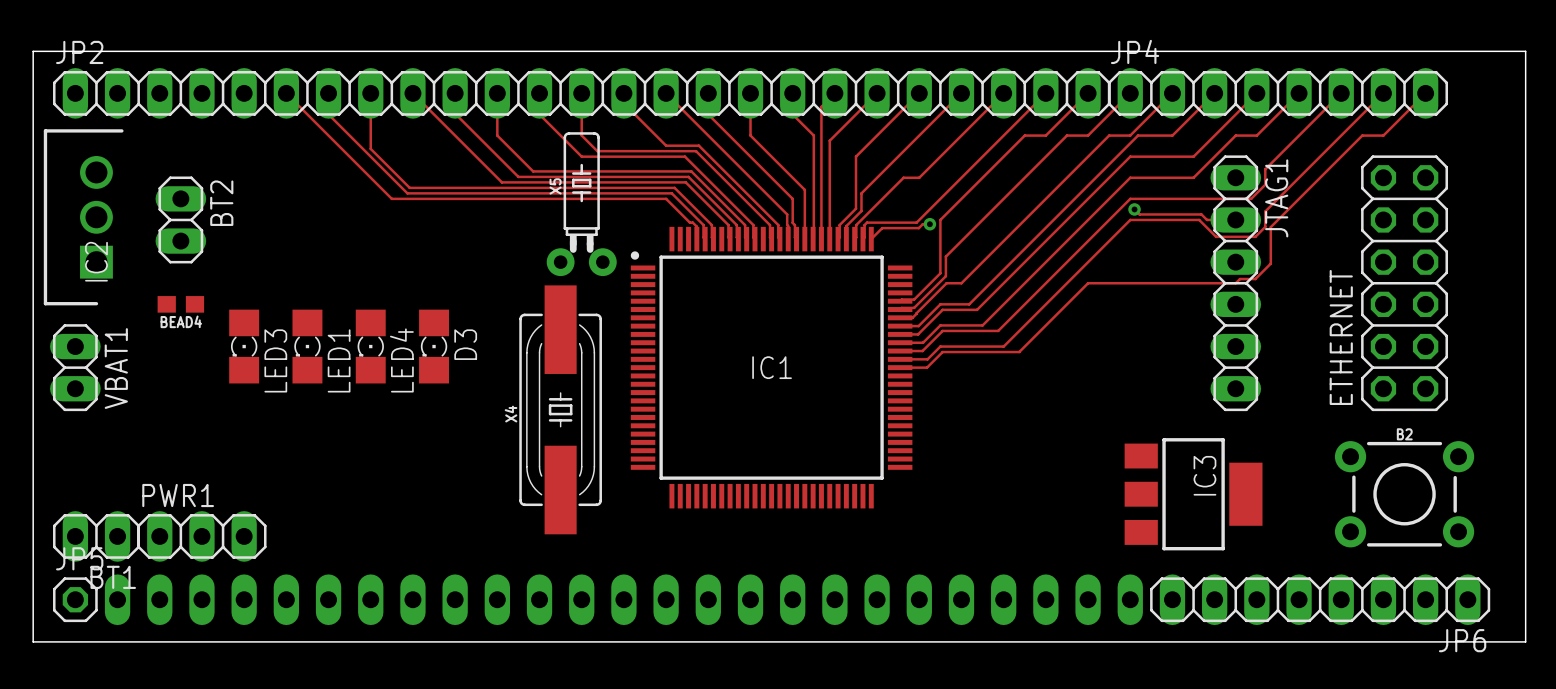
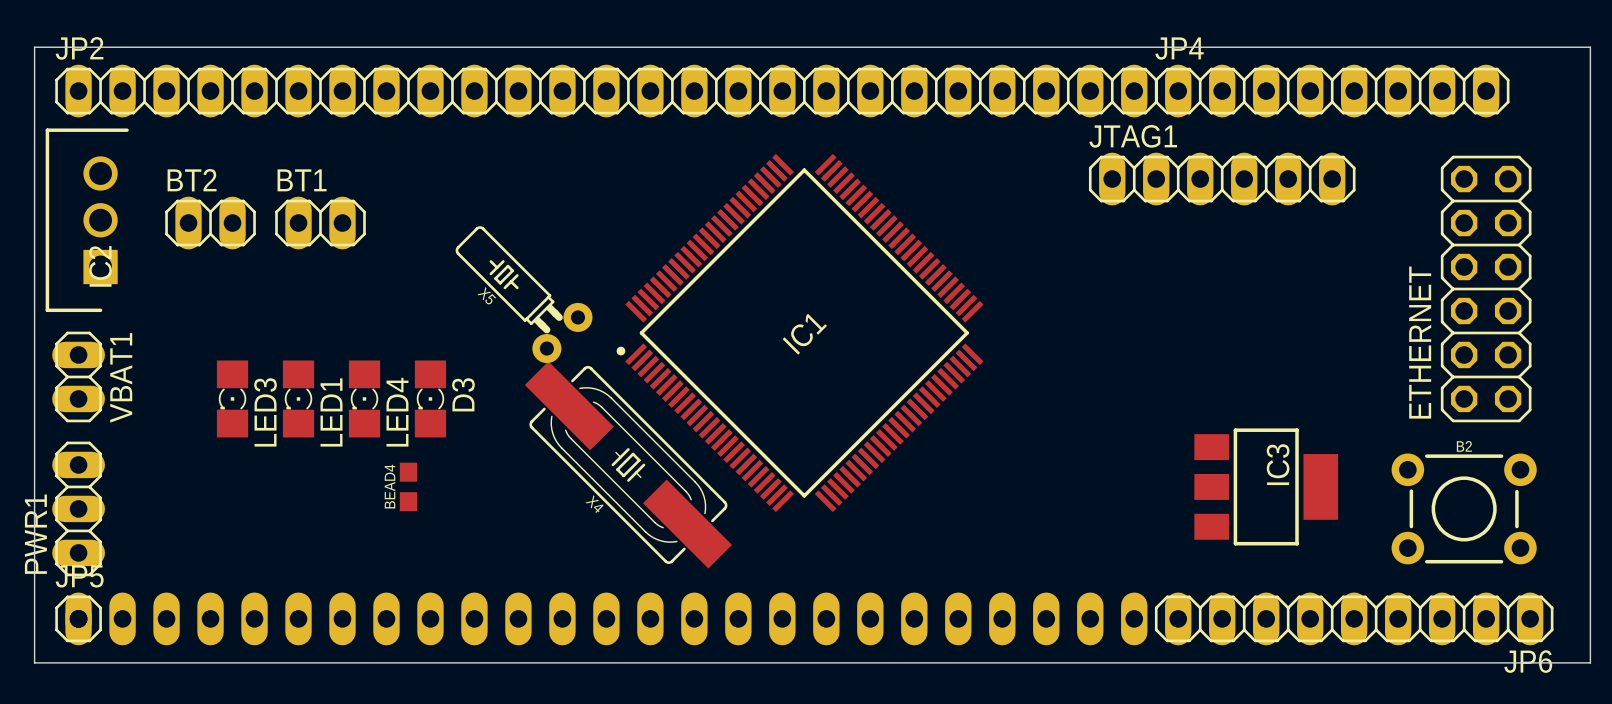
track: (286, 93) (391, 198) (666, 198) (689, 222) (696, 226) (696, 239) -> none
track: (328, 93) (328, 114) (407, 193) (671, 193) (703, 225) (705, 239) -> none
track: (370, 93) (370, 148) (409, 187) (674, 187) (711, 225) (713, 239) -> none
track: (412, 93) (501, 182) (685, 182) (728, 225) (730, 239) -> none
track: (455, 93) (455, 113) (518, 176) (688, 176) (736, 225) (738, 239) -> none
track: (497, 93) (497, 135) (533, 171) (691, 171) (745, 225) (746, 239) -> none
track: (539, 93) (539, 114) (581, 156) (684, 156) (753, 225) (754, 239) -> none
track: (581, 93) (581, 135) (597, 151) (696, 151) (770, 225) (771, 239) -> none
track: (623, 93) (623, 103) (666, 145) (698, 145) (778, 225) (779, 239) -> none
track: (666, 93) (787, 214) (788, 239) -> none
track: (708, 93) (708, 114) (792, 198) (792, 222) (794, 225) (796, 239) -> none
track: (750, 93) (750, 135) (804, 189) (804, 239) -> none
track: (792, 93) (792, 114) (813, 135) (813, 239) -> none
track: (834, 93) (821, 106) (821, 239) -> none
track: (877, 93) (829, 140) (829, 239) -> none
track: (919, 93) (856, 156) (856, 208) (839, 225) (838, 239) -> none
track: (961, 93) (861, 193) (861, 211) (846, 226) (846, 239) -> none
track: (1003, 93) (919, 177) (903, 177) (856, 225) (854, 239) -> none
track: (1045, 93) (916, 222) (867, 222) (864, 225) (862, 239) -> none
track: (1088, 93) (1045, 135) (1024, 135) (940, 219) (940, 273) (914, 299) (900, 301) -> none
track: (1130, 93) (1088, 135) (1066, 135) (945, 256) (945, 276) (914, 307) (900, 309) -> none
track: (1172, 93) (1130, 135) (1109, 135) (961, 283) (946, 283) (912, 317) (900, 317) -> none
track: (1214, 93) (1172, 135) (1138, 135) (969, 304) (940, 304) (918, 326) (900, 326) -> none
track: (1256, 93) (1193, 156) (1130, 156) (977, 309) (942, 309) (918, 334) (900, 334) -> none
track: (1299, 93) (1256, 135) (1235, 135) (1193, 177) (1130, 177) (982, 325) (940, 325) (923, 342) (900, 342) -> none
track: (1341, 93) (1265, 169) (1265, 184) (1251, 198) (1130, 198) (998, 330) (942, 330) (922, 351) (900, 351) -> none
track: (1383, 93) (1265, 211) (1265, 226) (1255, 236) (1216, 236) (1199, 219) (1130, 219) (1003, 346) (940, 346) (927, 359) (900, 359) -> none
track: (1425, 93) (1383, 135) (1362, 135) (1270, 227) (1270, 263) (1255, 279) (1239, 279) (1235, 283) (1088, 283) (1019, 352) (942, 352) (927, 367) (900, 367) -> none
JTAG1 name position: JTAG1 (1276, 198) -> JTAG1 (1133, 136)
BT2 name position: BT2 (221, 203) -> BT2 (192, 180)
X5 rotation: 0° (581, 204) -> 45° counterclockwise (524, 294)
X5 position: (581, 204) -> (524, 294)
track: (1134, 209) (1139, 214) (1201, 214) (1206, 219) (1235, 219) -> none
via: (1134, 209) -> none
BT2 rotation: 0° (180, 219) -> 90° clockwise (210, 223)
track: (929, 224) (922, 224) (918, 228) (882, 228) (871, 239) -> none
via: (929, 224) -> none
JTAG1 rotation: 0° (1235, 283) -> 90° clockwise (1222, 179)
ETHERNET position: (1404, 283) -> (1486, 289)
BEAD4 rotation: 0° (180, 304) -> 90° clockwise (408, 486)
BEAD4 position: (180, 304) -> (408, 486)
LED3 position: (244, 346) -> (232, 398)
LED1 position: (307, 346) -> (298, 398)
LED4 position: (370, 346) -> (364, 398)
D3 position: (434, 346) -> (430, 398)
IC1 rotation: 0° (771, 367) -> 45° counterclockwise (800, 332)
X4 rotation: 0° (560, 409) -> 45° counterclockwise (628, 464)
IC3 position: (1193, 494) -> (1266, 486)
PWR1 name position: PWR1 (178, 495) -> PWR1 (35, 534)
BT1 position: (96, 536) -> (320, 223)
PWR1 rotation: 0° (201, 536) -> 90° clockwise (78, 508)
PWR1 position: (201, 536) -> (78, 508)
JP6 footprint: [1150, 574, 1491, 626] -> [1154, 592, 1554, 646]
BT1 name position: BT1 (113, 577) -> BT1 (302, 180)
part position: (623, 599) -> (606, 618)

